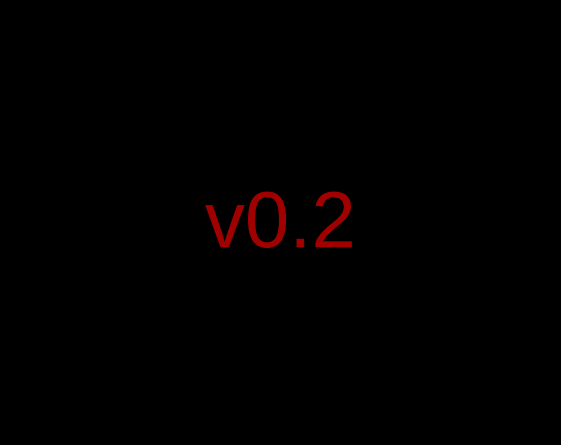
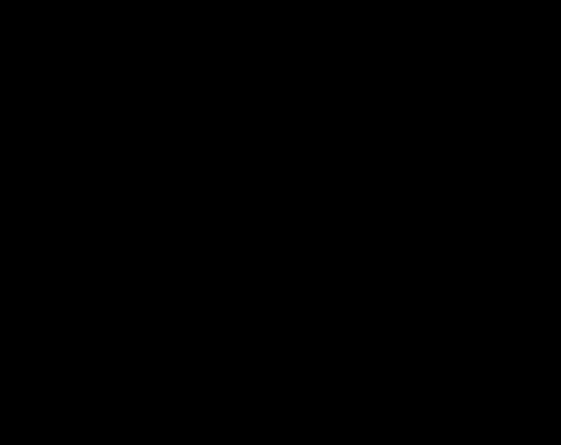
text: v0.2 (278, 219) -> none

